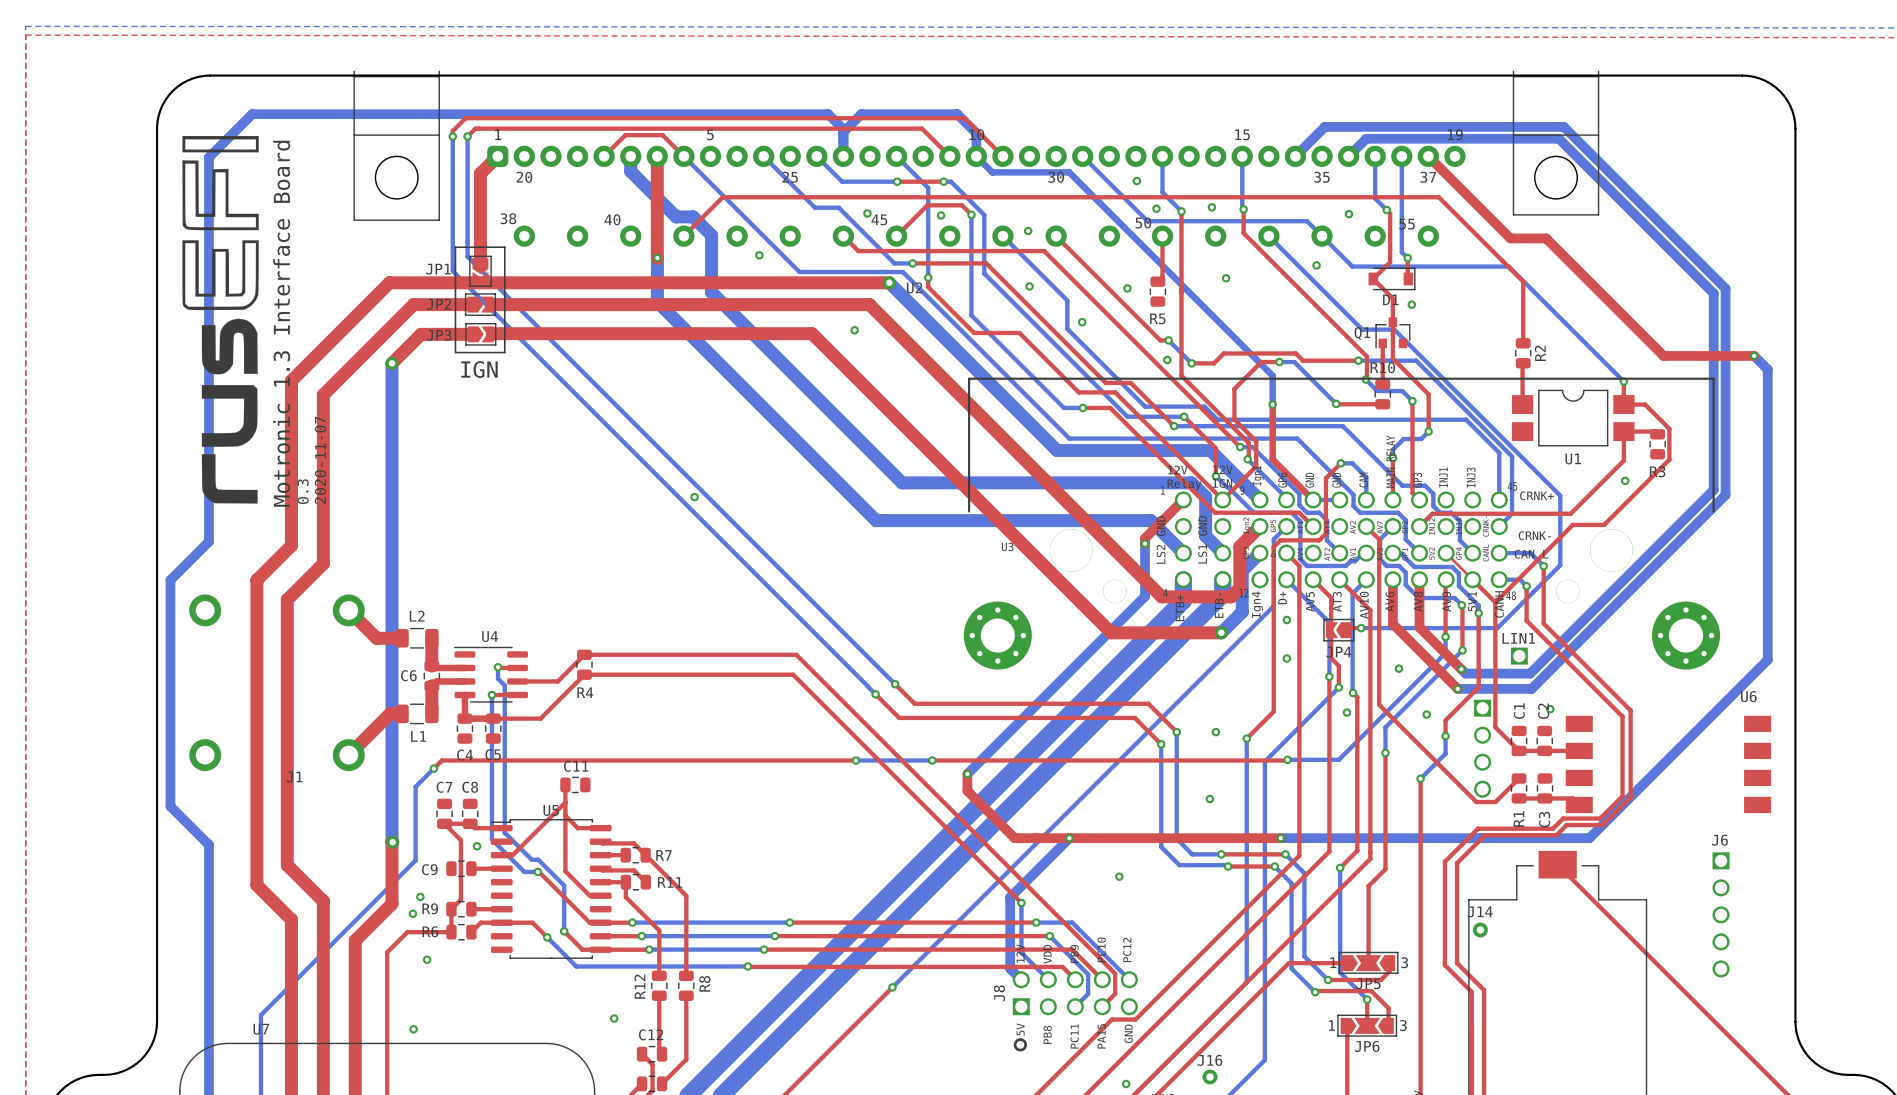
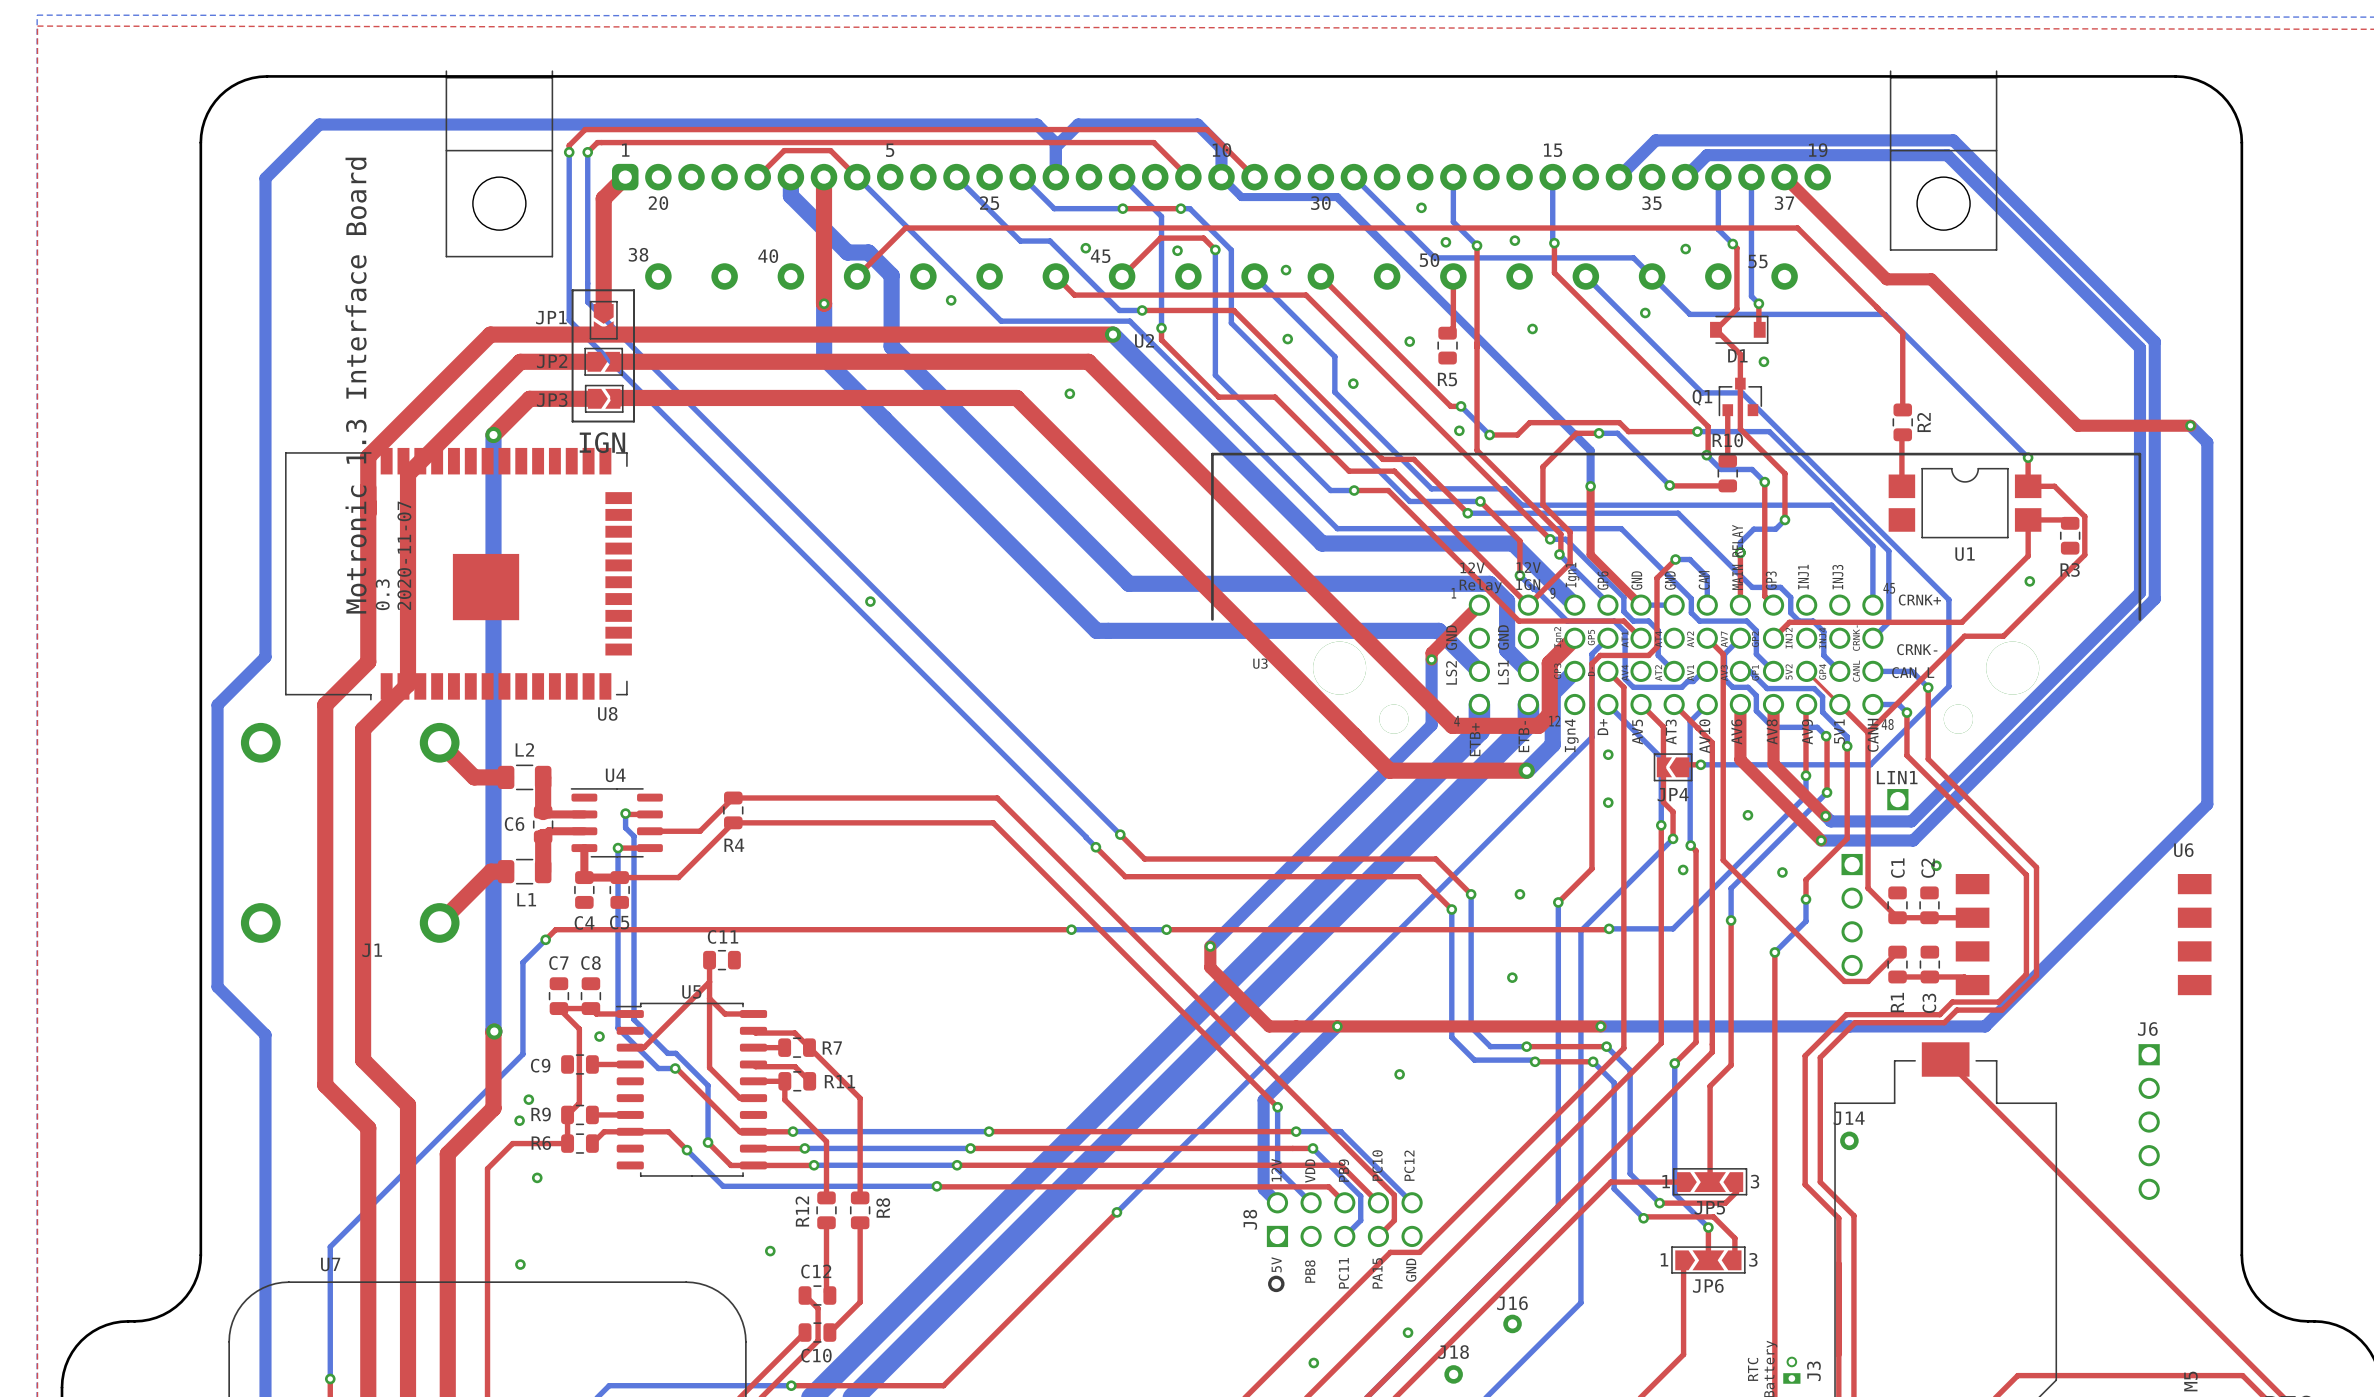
drawing: [182, 136, 259, 504] -> none
U8: none -> (458, 574)
part: (997, 635) -> none
part: (1686, 635) -> none

